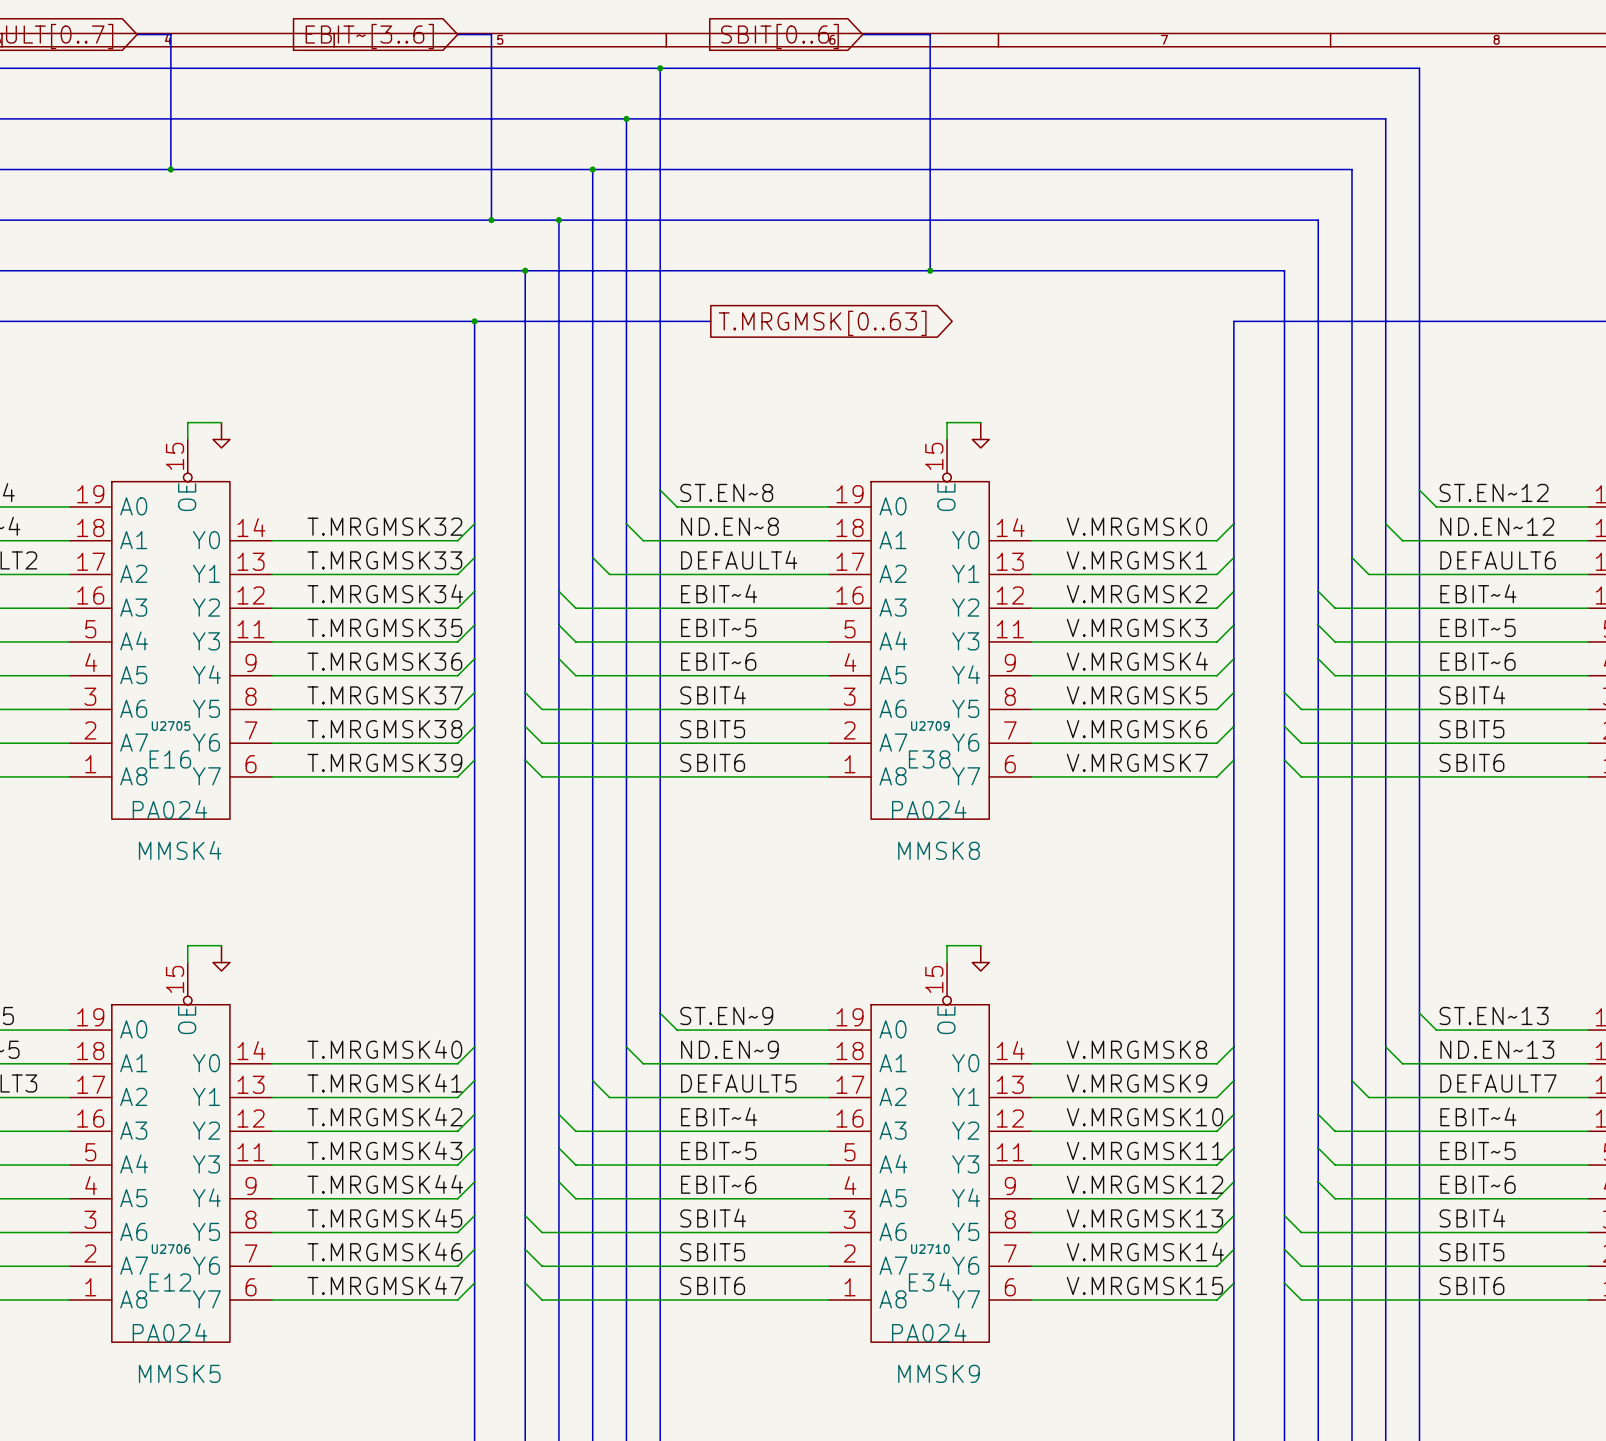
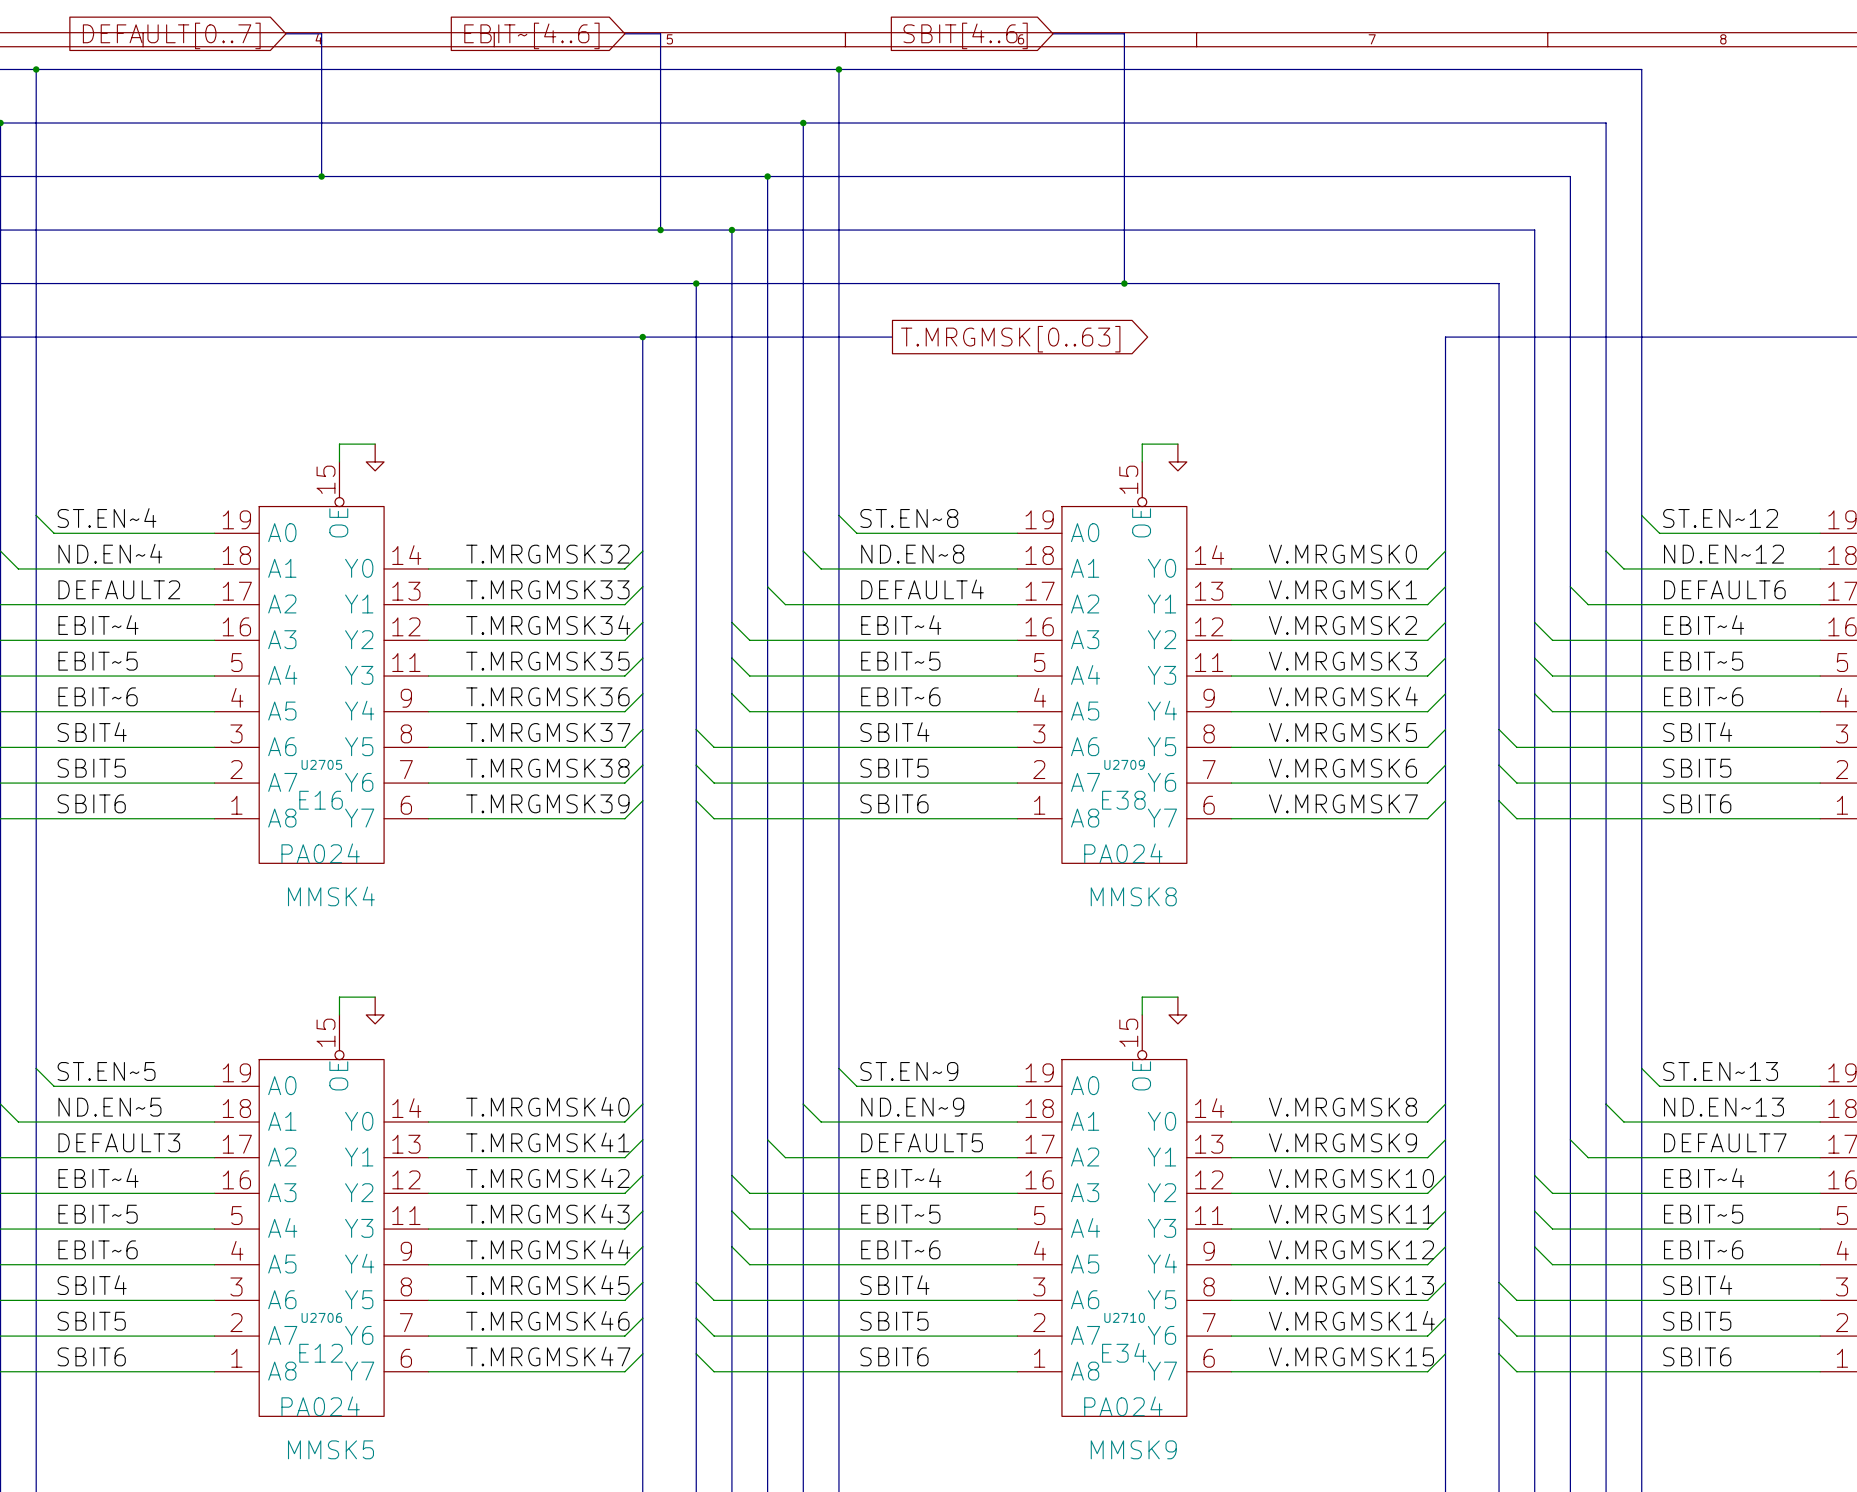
global label: EBIT~[3..6] (369, 36) -> EBIT~[4..6] (531, 35)
global label: SBIT[0..6] (779, 36) -> SBIT[4..6] (965, 35)

